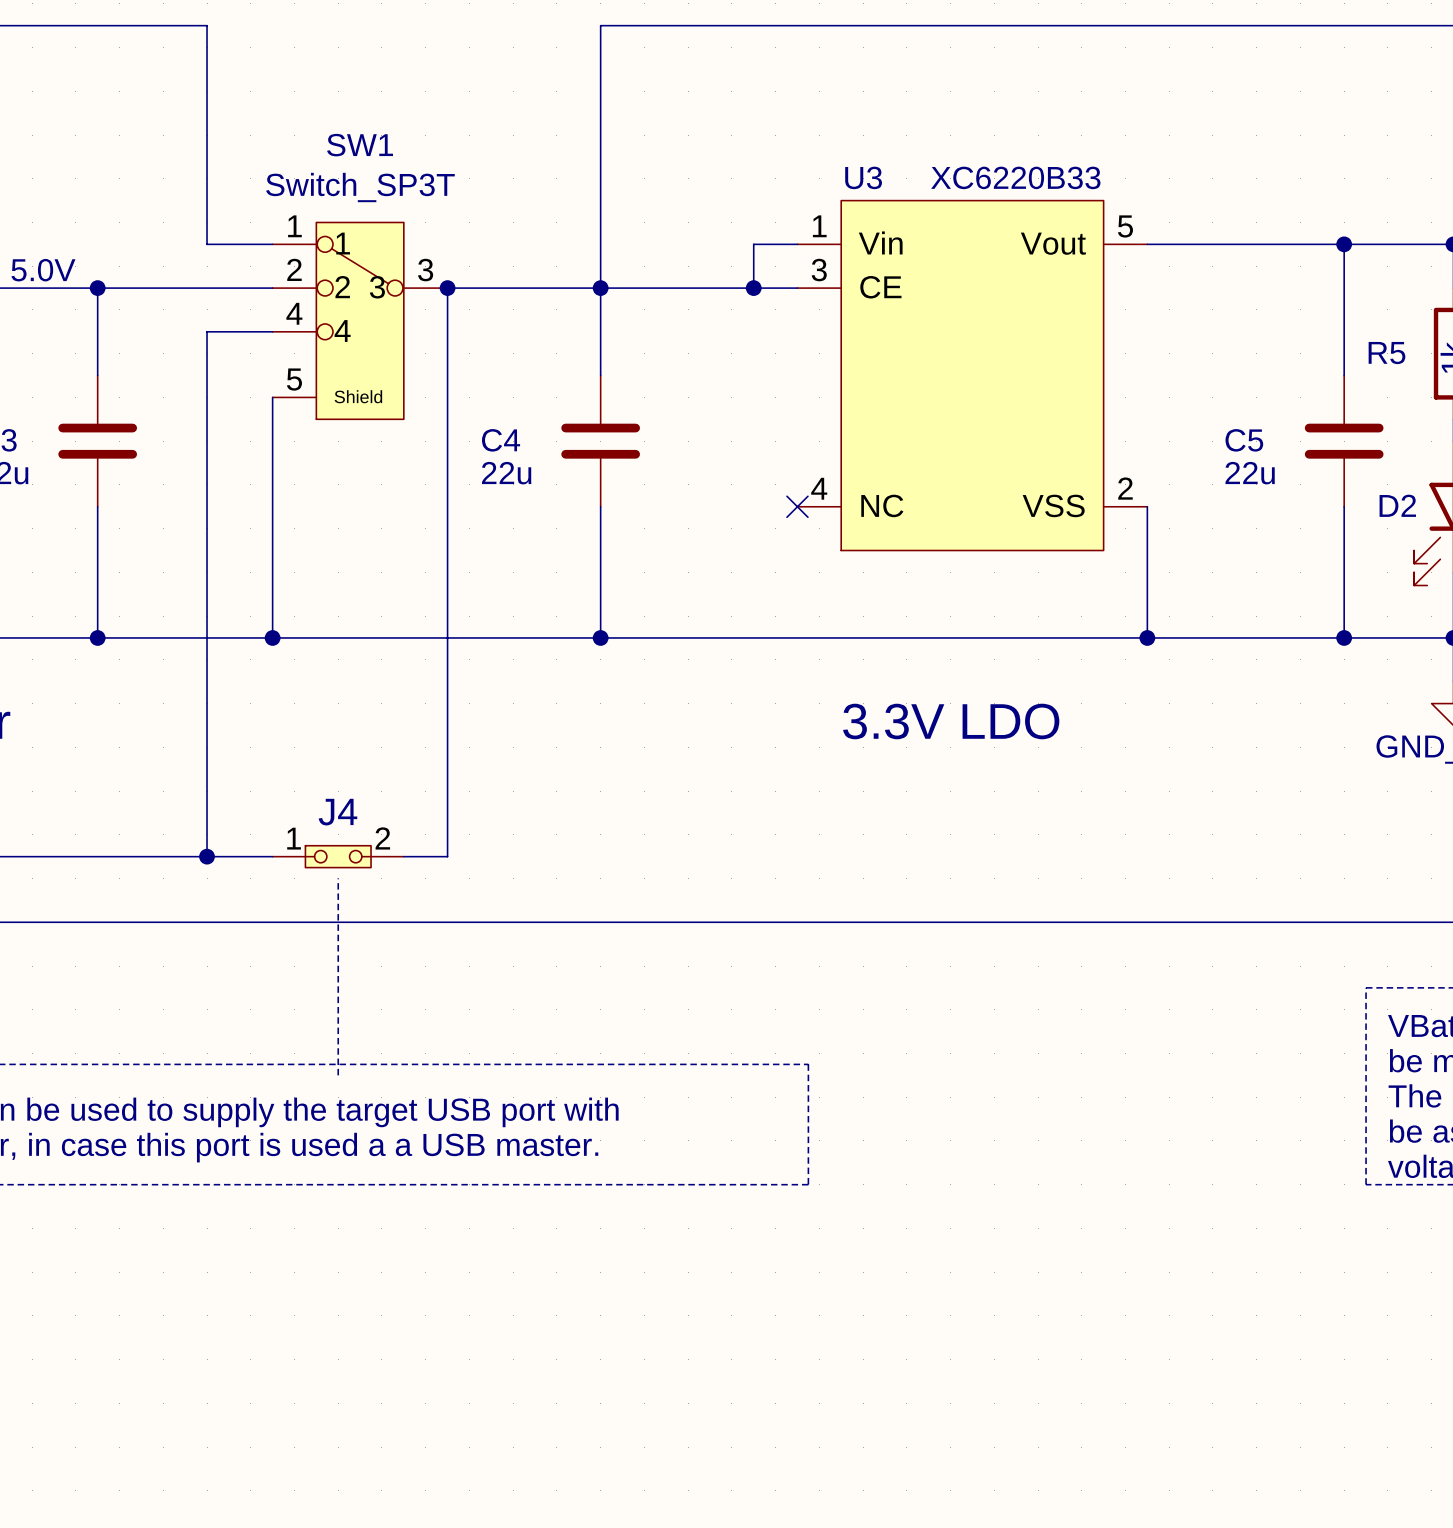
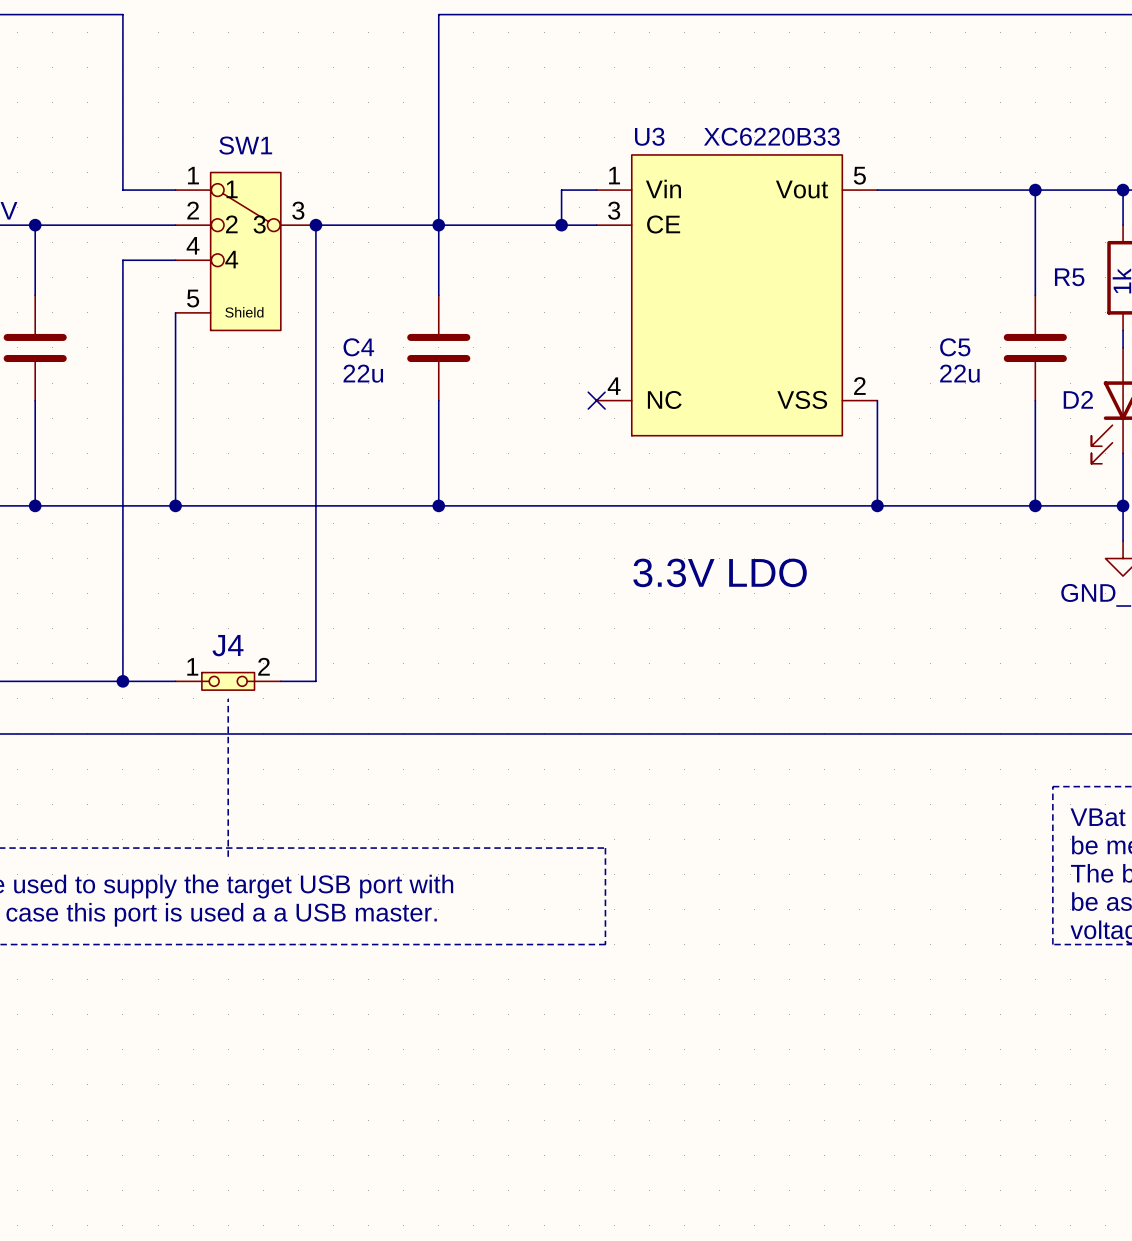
SW1 name position: SW1 (360, 145) -> SW1 (245, 145)
SW1 value: Switch_SP3T (360, 187) -> none

